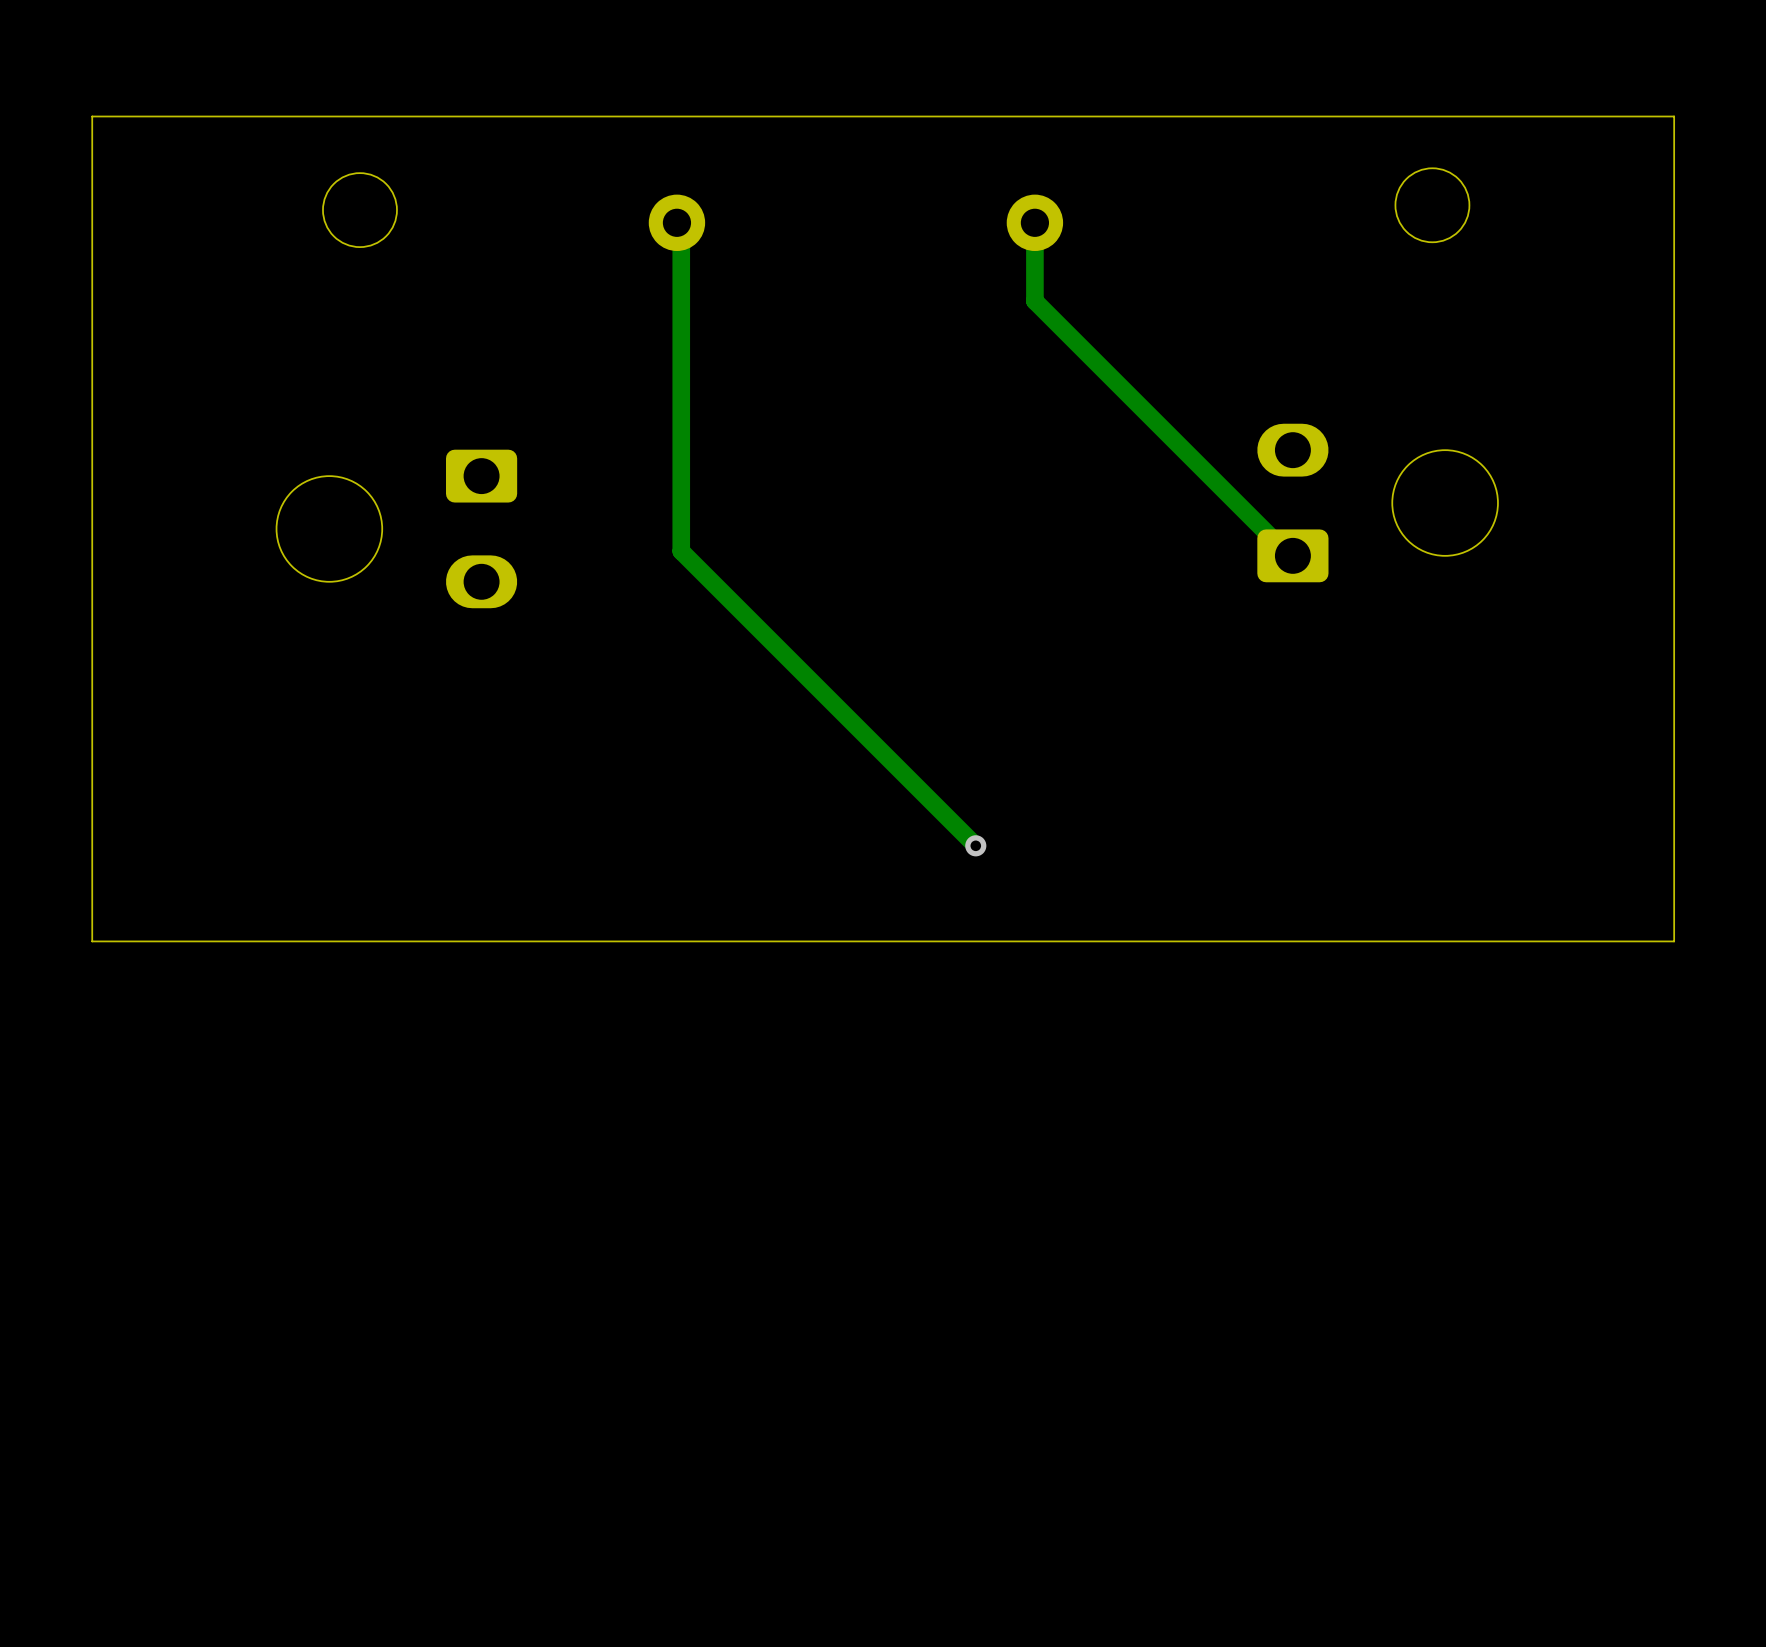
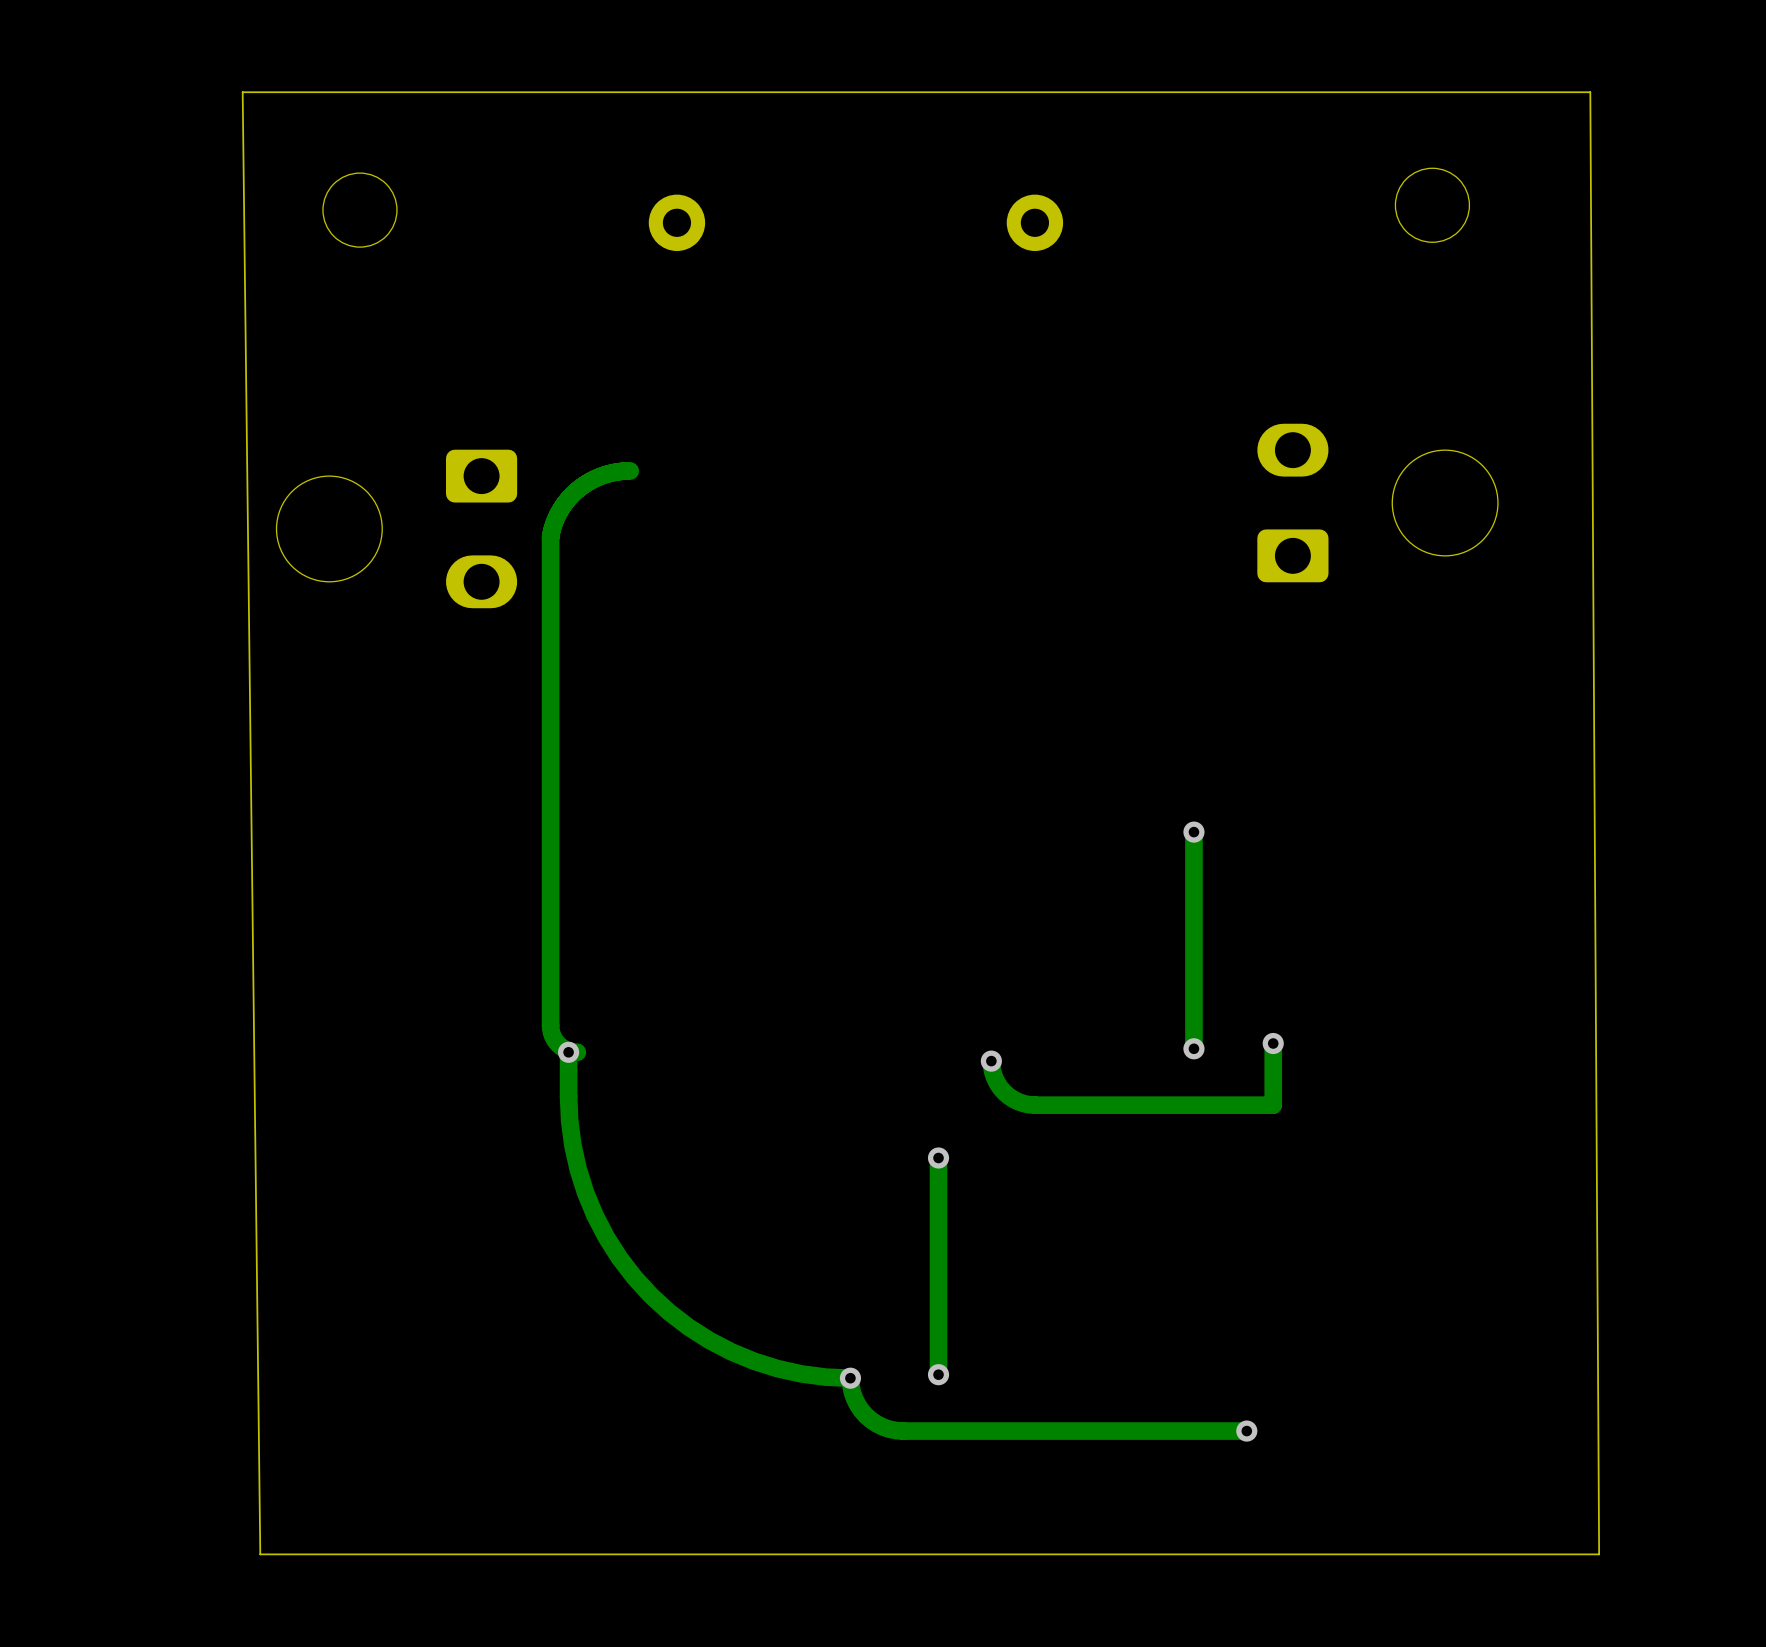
board edge: (1674, 116) (92, 116) (92, 941) (1674, 941) (1674, 116) -> (1590, 92) (1599, 1554) (260, 1554) (242, 92) (1590, 92)
track: (676, 222) (681, 227) (681, 551) (975, 845) -> none
track: (1034, 222) (1034, 301) (1289, 555) (1292, 555) -> none
track: none -> (630, 470) (602, 475) (577, 489) (559, 511) (550, 537) (550, 1025) (552, 1035) (558, 1044) (567, 1050) (577, 1052)
track: none -> (1193, 832) (1193, 1048)
via: none -> (1193, 832)
via: (975, 845) -> none
track: none -> (1273, 1043) (1273, 1105) (1029, 1104) (1013, 1099) (1000, 1087) (994, 1077) (991, 1061)
via: none -> (1273, 1043)
via: none -> (1193, 1048)
track: none -> (568, 1050) (569, 1120) (572, 1145) (578, 1169) (594, 1215) (619, 1258) (651, 1295) (688, 1327) (709, 1340) (731, 1351) (777, 1368) (801, 1373) (850, 1378) (854, 1398) (861, 1410) (876, 1423) (896, 1430) (1246, 1431)
via: none -> (568, 1052)
via: none -> (991, 1061)
track: none -> (938, 1158) (938, 1374)
via: none -> (938, 1158)
via: none -> (938, 1374)
via: none -> (850, 1378)
via: none -> (1246, 1431)

